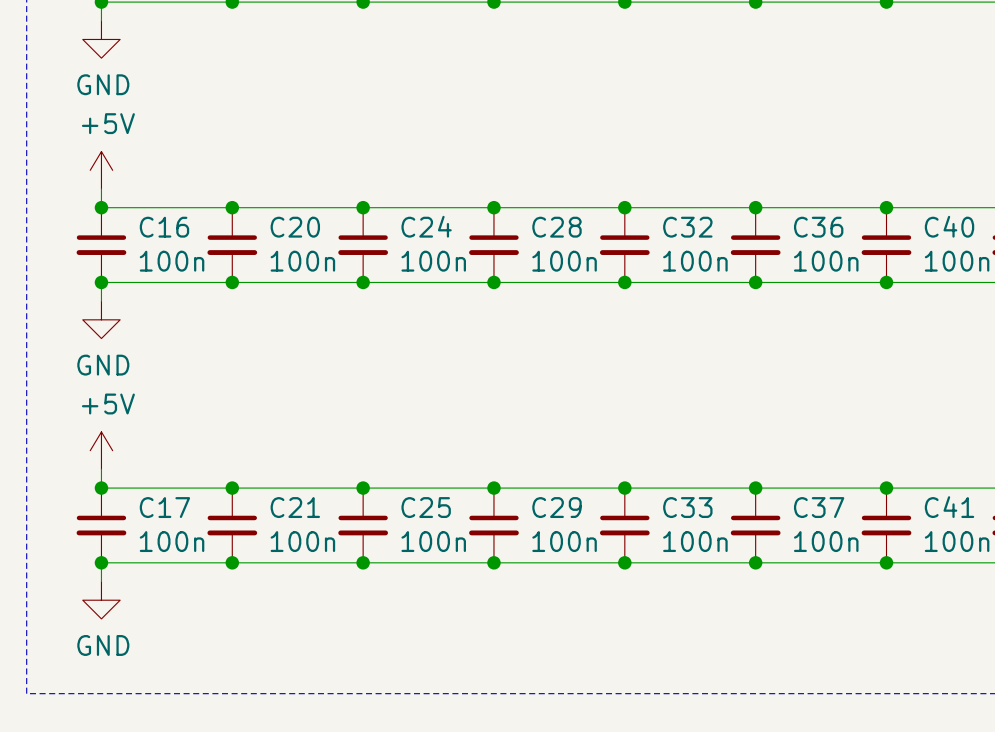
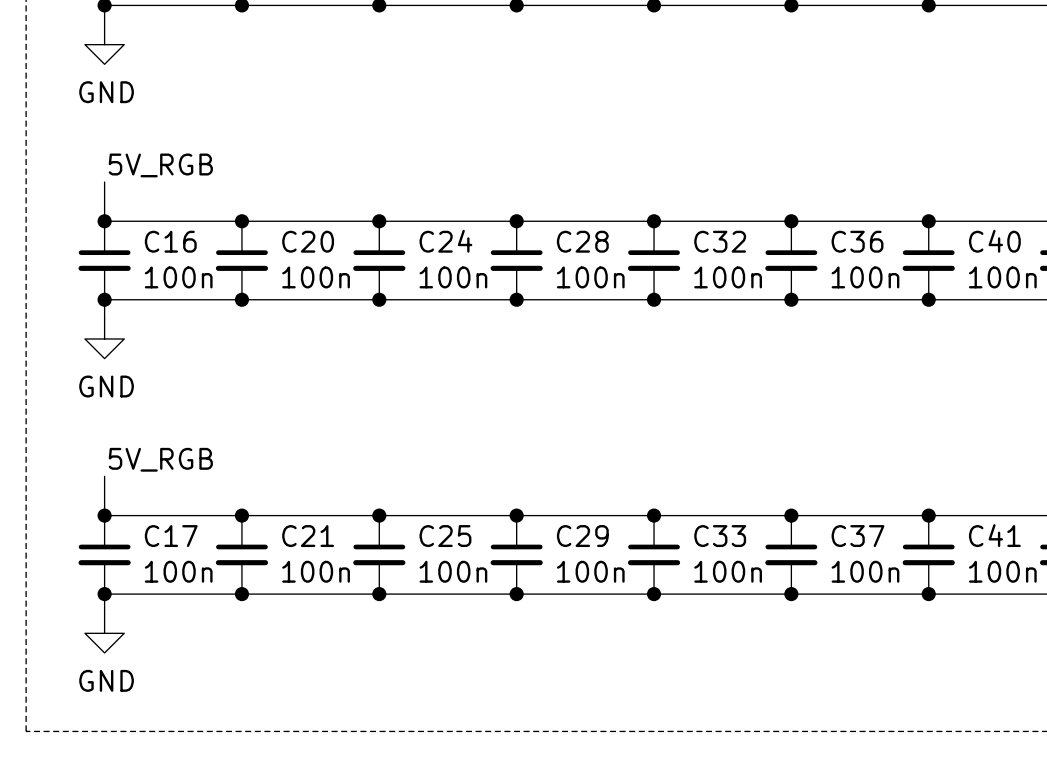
label: none -> 5V_RGB (160, 165)
power symbol: +5V (101, 170) -> none
label: none -> 5V_RGB (160, 459)
power symbol: +5V (101, 450) -> none

